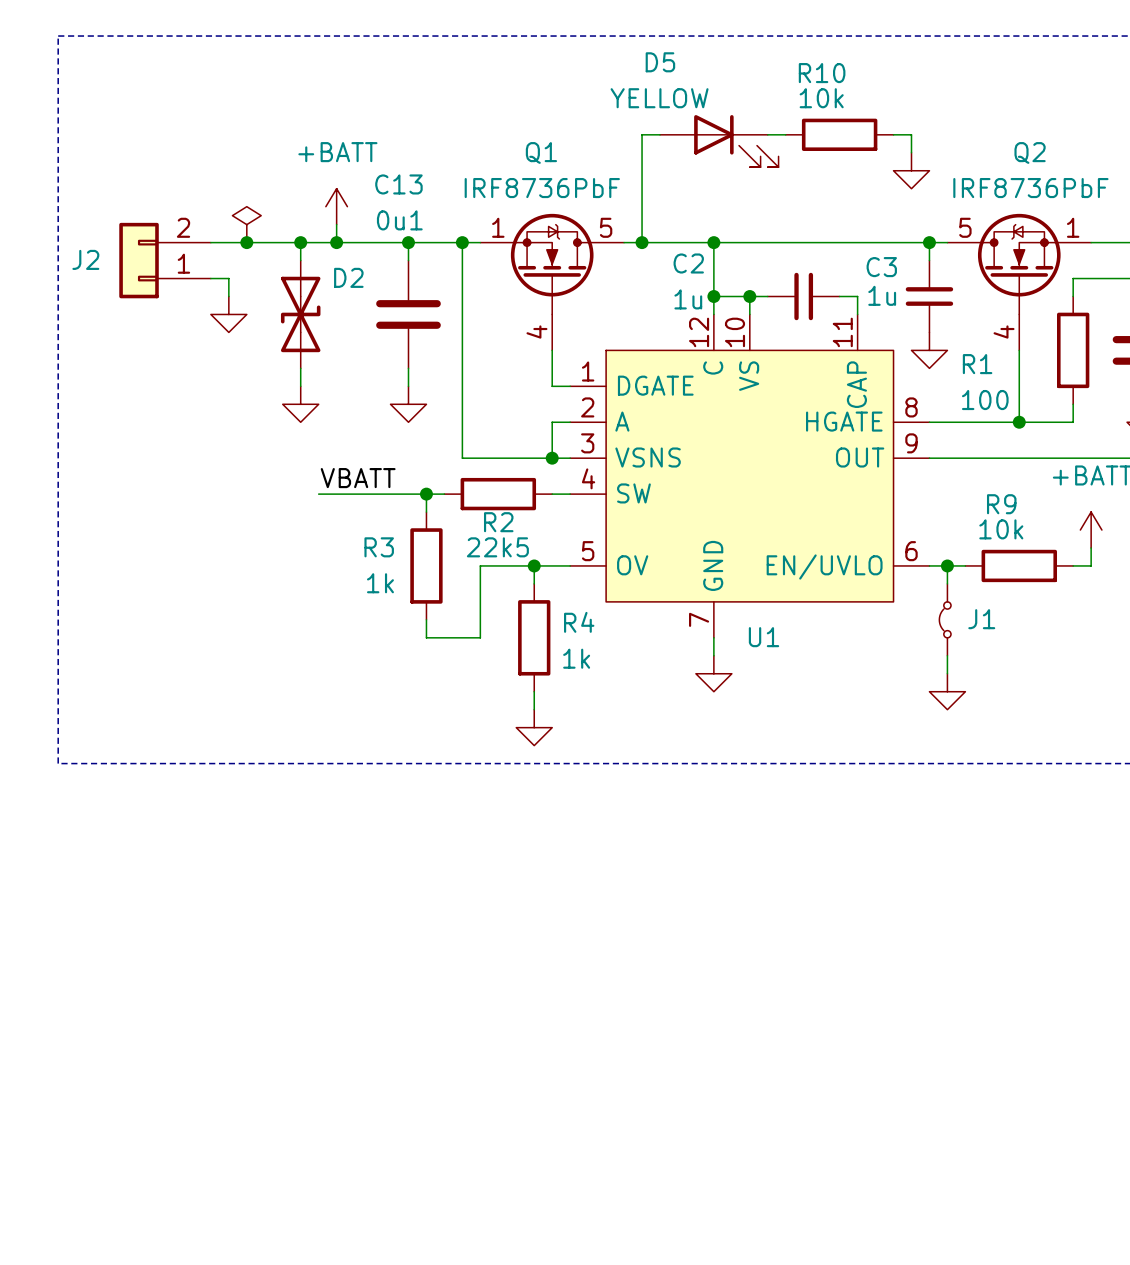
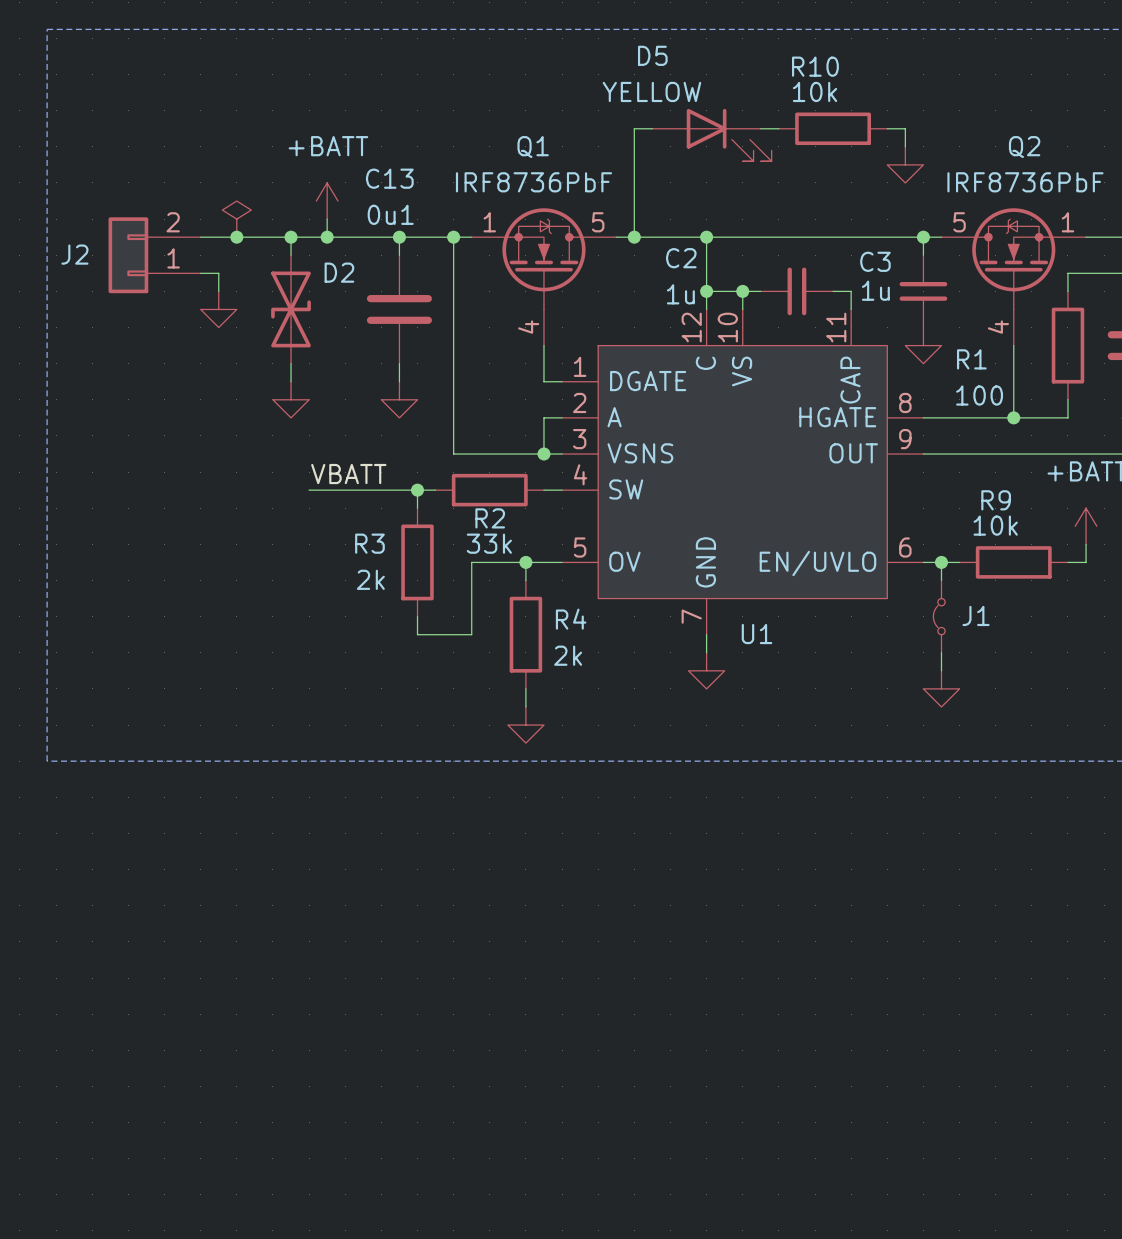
R2 value: 22k5 (497, 547) -> 33k (489, 543)
R3 value: 1k (380, 583) -> 2k (370, 579)
R4 value: 1k (576, 658) -> 2k (568, 655)

